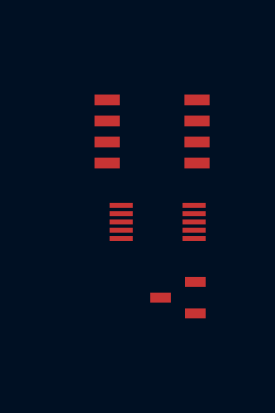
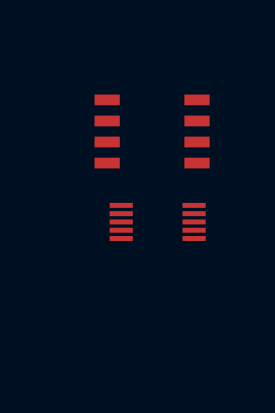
part: (177, 297) -> none

